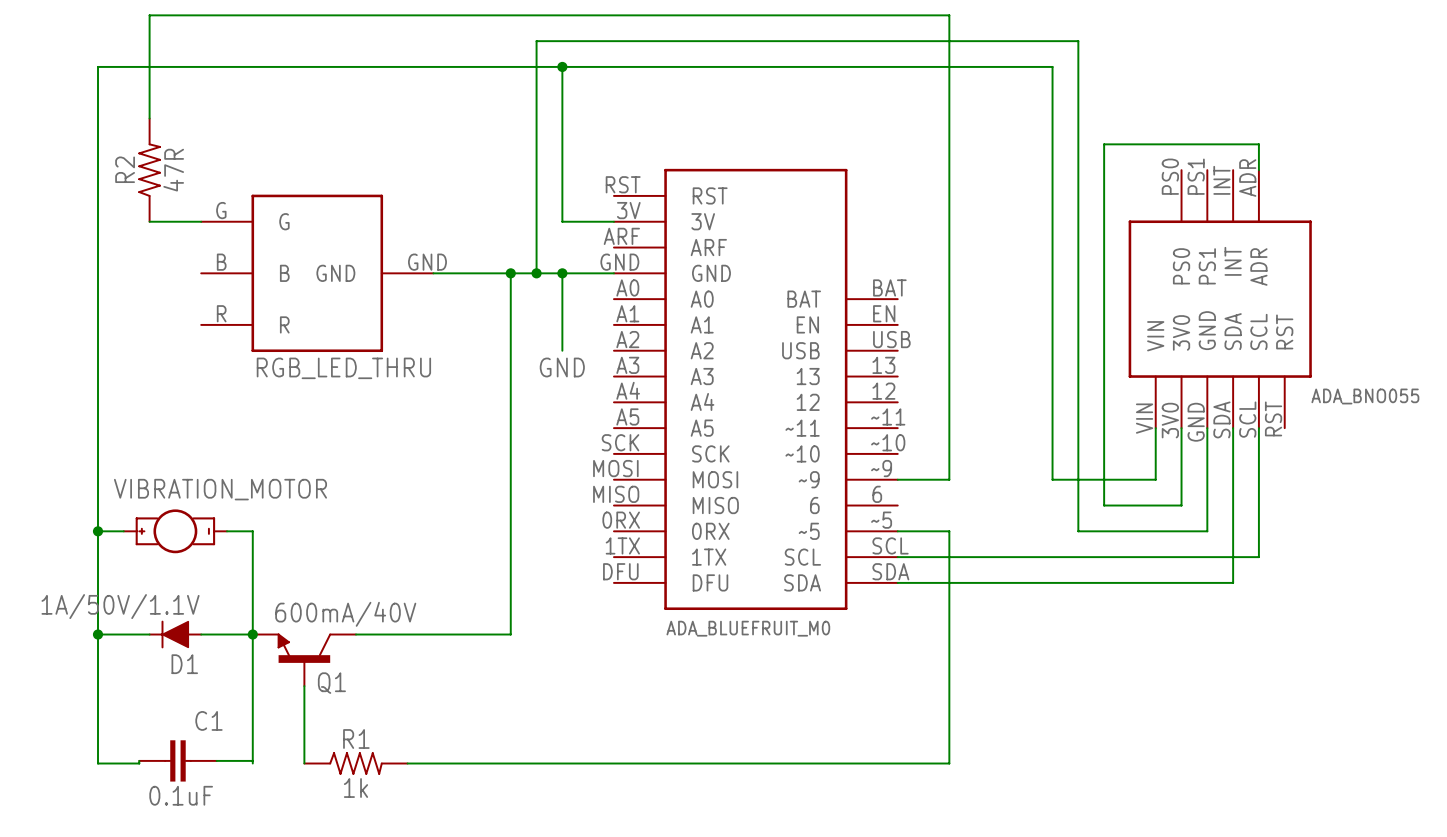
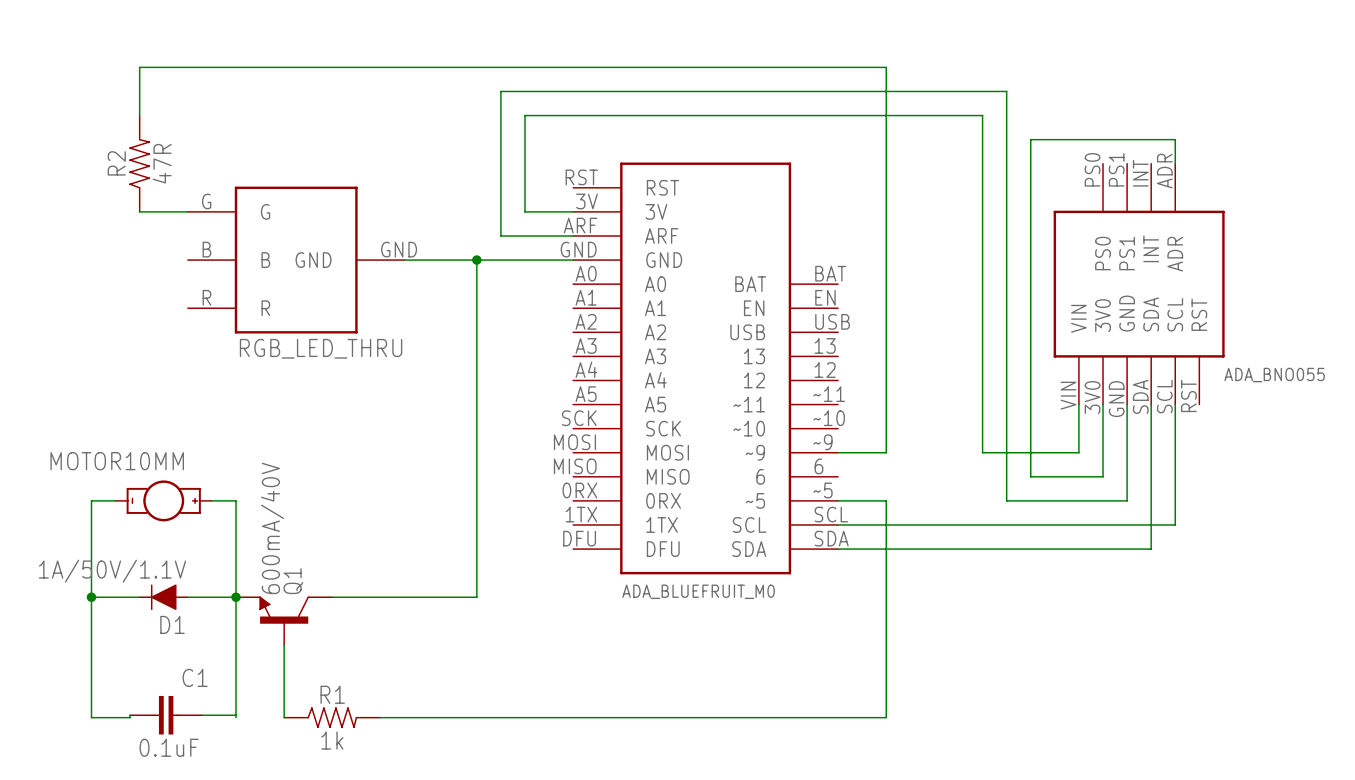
wire: (562, 66) (562, 118) -> (982, 115) (524, 115)
junction: (562, 66) -> none
wire: (536, 92) (536, 41) (1078, 41) (1078, 92) -> (500, 91) (1006, 91)
wire: (1052, 118) (1052, 66) (949, 66) (949, 15) (149, 15) (149, 66) (98, 66) (98, 531) -> none
wire: (536, 247) (536, 273) -> (500, 235) (573, 235)
junction: (536, 273) -> none
wire: (562, 273) (562, 350) -> none
junction: (562, 273) -> none
label: GND (562, 367) -> none
part value: VIBRATION_MOTOR (220, 489) -> MOTOR10MM (117, 461)
junction: (98, 531) -> none
part rotation: 0° (175, 531) -> 180° (163, 500)
Q1 value rotation: 0° (345, 614) -> 90° counterclockwise (272, 528)
Q1 name rotation: 0° (331, 683) -> 90° counterclockwise (293, 581)
Q1 name position: Q1 (331, 683) -> Q1 (293, 581)

